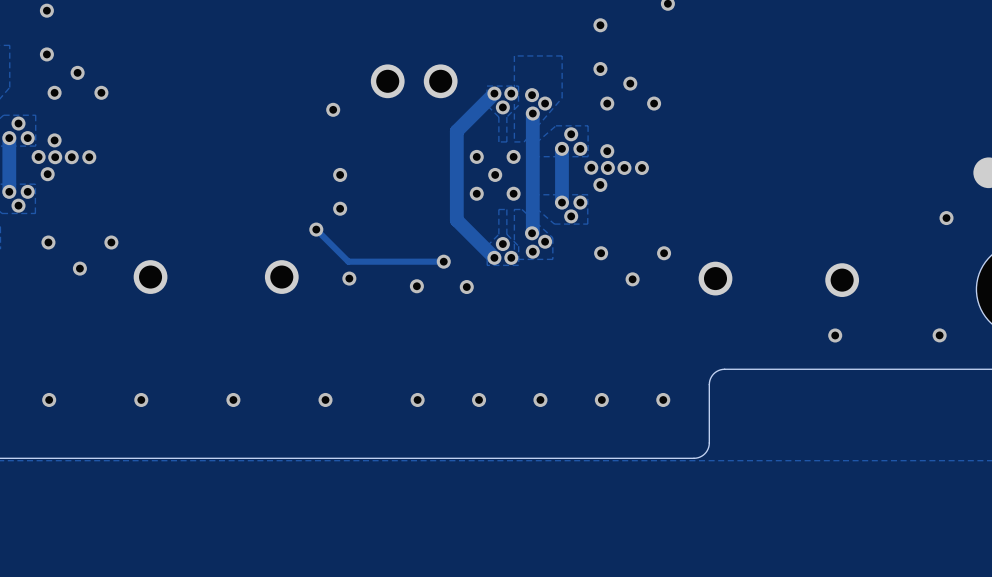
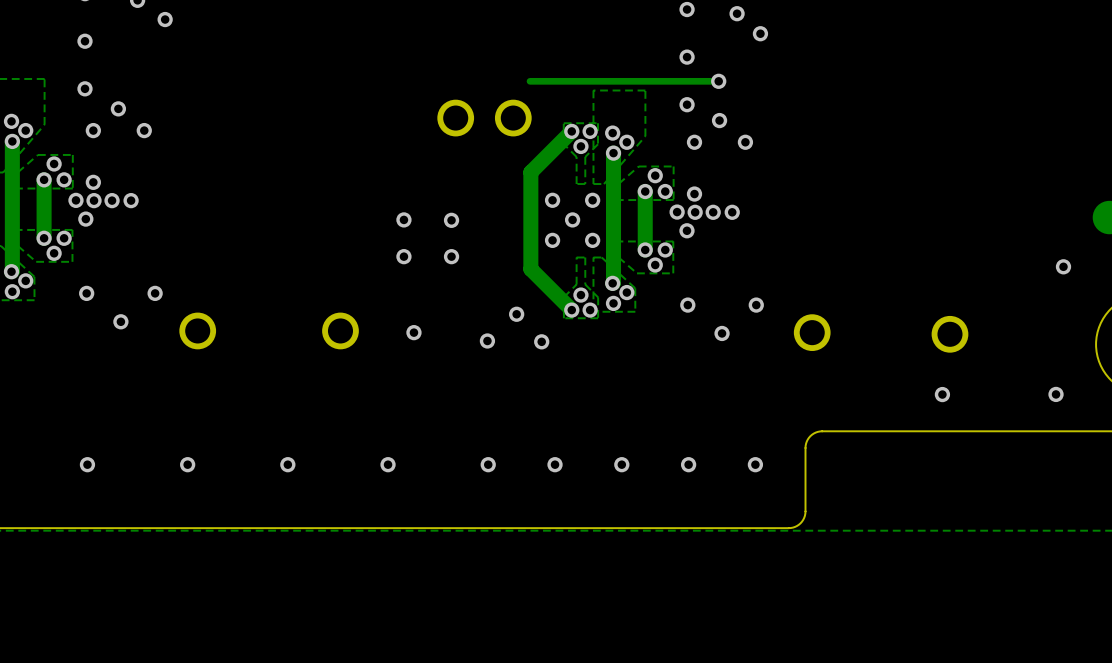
track: none -> (718, 81) (530, 81)
via: none -> (718, 81)
via: (333, 109) -> none
via: none -> (451, 220)
via: none -> (451, 256)
track: (316, 229) (348, 261) (443, 261) -> none
via: (316, 229) -> none

